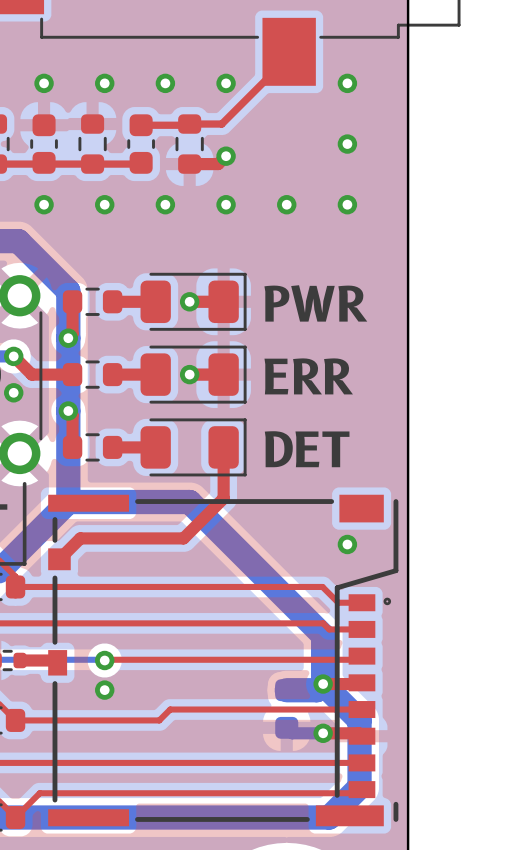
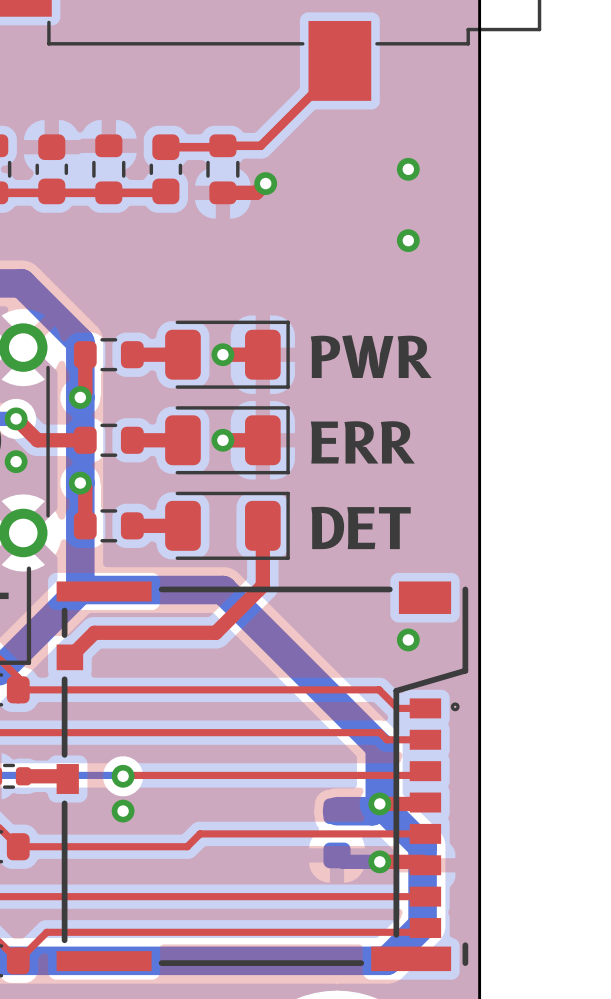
via: (44, 83) -> none
via: (104, 83) -> none
via: (165, 83) -> none
via: (226, 83) -> none
via: (347, 83) -> none
via: (44, 204) -> none
via: (104, 204) -> none
via: (165, 204) -> none
via: (226, 204) -> none
via: (286, 204) -> none

